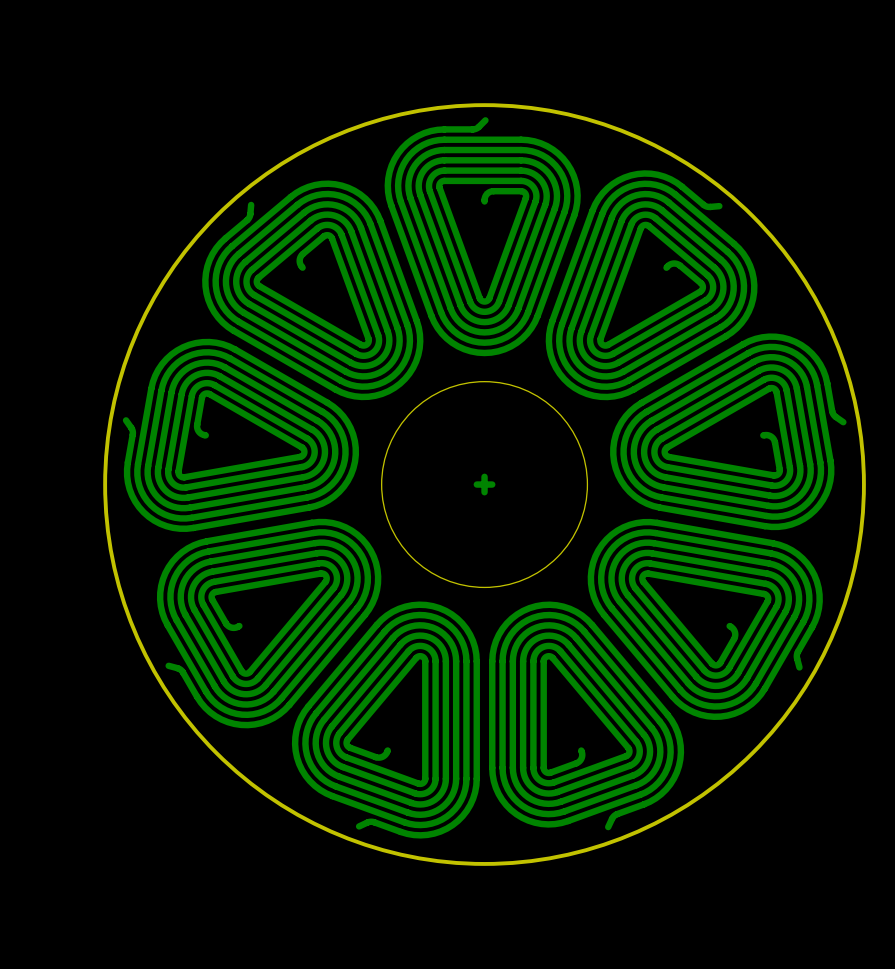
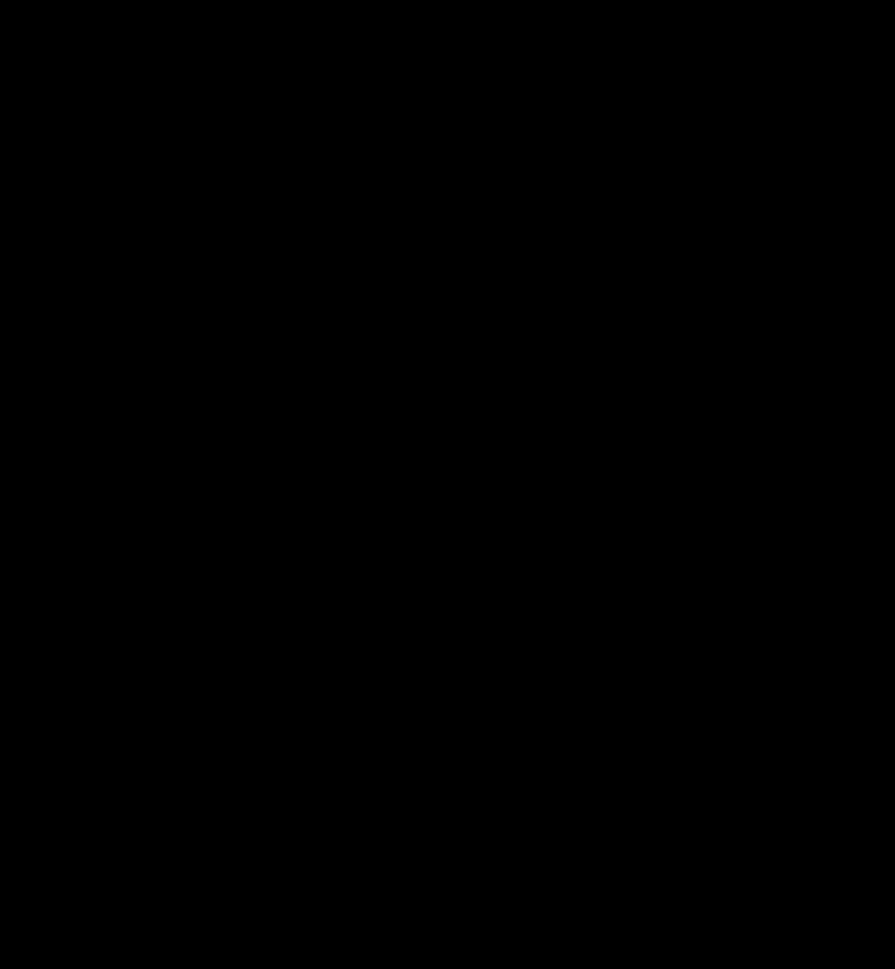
round board edge: [103, 103, 866, 866] -> none
track: (485, 120) (475, 129) (437, 129) (424, 133) (412, 139) (402, 148) (394, 159) (389, 171) (387, 185) (391, 205) (434, 322) (446, 338) (458, 346) (470, 351) (484, 352) (498, 351) (511, 346) (522, 338) (535, 322) (574, 215) (577, 202) (577, 188) (570, 169) (558, 153) (540, 143) (527, 140) (433, 141) (418, 147) (403, 164) (398, 179) (399, 196) (443, 317) (458, 334) (473, 341) (484, 342) (506, 337) (519, 326) (525, 317) (564, 212) (566, 190) (564, 179) (555, 165) (542, 155) (526, 150) (440, 150) (424, 156) (412, 169) (408, 181) (409, 194) (452, 312) (460, 323) (467, 328) (484, 332) (493, 331) (505, 325) (516, 312) (554, 208) (556, 191) (554, 183) (547, 172) (537, 164) (525, 160) (441, 160) (429, 164) (421, 173) (418, 182) (419, 191) (460, 305) (469, 317) (484, 322) (496, 319) (507, 308) (545, 205) (546, 192) (540, 179) (532, 173) (524, 170) (442, 170) (435, 173) (430, 178) (429, 191) (470, 301) (475, 309) (484, 311) (493, 309) (498, 303) (535, 201) (536, 194) (532, 186) (522, 181) (444, 180) (439, 183) (439, 187) (479, 298) (484, 301) (489, 298) (526, 195) (521, 191) (492, 191) (486, 194) (484, 201) -> none
track: (251, 204) (248, 218) (220, 242) (212, 253) (207, 266) (205, 279) (206, 293) (210, 306) (218, 317) (233, 330) (341, 392) (354, 396) (375, 395) (388, 391) (400, 383) (409, 373) (418, 355) (420, 341) (418, 327) (380, 220) (374, 208) (365, 198) (348, 187) (328, 183) (308, 186) (296, 192) (224, 254) (216, 274) (216, 291) (222, 306) (234, 318) (345, 383) (367, 386) (378, 384) (393, 375) (406, 357) (409, 341) (408, 329) (370, 224) (358, 206) (344, 197) (328, 194) (317, 195) (301, 201) (235, 257) (227, 271) (226, 289) (231, 301) (240, 310) (349, 373) (366, 376) (375, 374) (386, 367) (392, 361) (398, 349) (398, 332) (361, 227) (351, 213) (340, 206) (327, 204) (319, 205) (307, 210) (243, 264) (237, 274) (236, 286) (240, 295) (246, 302) (350, 362) (365, 366) (380, 360) (387, 350) (388, 334) (351, 231) (344, 221) (330, 214) (321, 215) (313, 218) (250, 271) (247, 277) (246, 284) (254, 295) (355, 353) (364, 355) (373, 352) (378, 344) (378, 336) (341, 235) (337, 228) (327, 224) (318, 227) (258, 277) (256, 282) (259, 286) (361, 344) (366, 344) (368, 338) (330, 236) (324, 236) (302, 254) (299, 261) (302, 267) -> none
track: (719, 206) (705, 206) (676, 182) (664, 176) (651, 173) (637, 174) (624, 177) (612, 184) (602, 193) (592, 210) (550, 327) (549, 348) (553, 361) (559, 373) (569, 383) (580, 391) (600, 396) (614, 396) (627, 392) (726, 336) (736, 328) (745, 317) (753, 298) (754, 285) (750, 265) (739, 248) (666, 188) (644, 183) (628, 187) (614, 195) (604, 209) (560, 330) (559, 341) (562, 357) (575, 375) (595, 385) (612, 386) (623, 383) (720, 327) (736, 312) (741, 302) (744, 285) (740, 269) (731, 255) (665, 199) (649, 194) (632, 196) (621, 203) (613, 213) (570, 332) (570, 349) (576, 361) (582, 368) (593, 374) (602, 376) (619, 373) (715, 318) (728, 306) (732, 294) (733, 286) (730, 273) (724, 262) (659, 208) (648, 204) (636, 206) (628, 211) (622, 218) (581, 331) (580, 347) (588, 360) (603, 366) (615, 364) (710, 309) (719, 301) (722, 292) (723, 283) (716, 269) (654, 217) (647, 214) (639, 215) (631, 224) (590, 335) (590, 344) (595, 352) (602, 355) (611, 354) (705, 300) (710, 295) (713, 286) (708, 276) (648, 226) (643, 225) (640, 228) (600, 338) (602, 344) (608, 344) (702, 289) (701, 283) (679, 265) (672, 263) (666, 267) -> none
round board edge: [381, 381, 589, 589] -> none
track: (126, 420) (132, 431) (127, 469) (127, 482) (132, 495) (139, 507) (148, 516) (160, 523) (173, 527) (193, 527) (315, 505) (334, 496) (343, 486) (350, 474) (354, 461) (355, 447) (353, 434) (347, 421) (333, 406) (235, 349) (222, 344) (209, 342) (189, 344) (171, 354) (158, 369) (152, 382) (137, 475) (141, 491) (155, 508) (169, 516) (186, 518) (312, 496) (327, 488) (335, 480) (344, 459) (345, 448) (341, 432) (327, 414) (230, 358) (209, 352) (192, 354) (178, 362) (167, 374) (162, 385) (147, 470) (150, 487) (161, 500) (172, 506) (185, 508) (309, 486) (324, 477) (332, 466) (334, 458) (335, 449) (331, 436) (320, 423) (225, 367) (208, 362) (200, 363) (188, 367) (178, 376) (172, 388) (157, 470) (160, 482) (167, 492) (175, 496) (185, 497) (303, 477) (317, 470) (324, 456) (323, 443) (314, 431) (219, 376) (208, 372) (193, 376) (186, 382) (182, 391) (168, 471) (169, 478) (174, 484) (186, 487) (301, 467) (310, 462) (314, 454) (313, 445) (308, 439) (214, 385) (207, 383) (198, 385) (192, 394) (178, 471) (180, 476) (184, 477) (300, 456) (304, 452) (301, 447) (207, 393) (202, 397) (197, 425) (199, 432) (205, 435) -> none
track: (843, 422) (833, 413) (825, 376) (820, 364) (811, 353) (801, 345) (789, 339) (775, 336) (762, 337) (743, 344) (635, 406) (621, 421) (616, 434) (613, 447) (614, 461) (618, 474) (625, 486) (640, 500) (653, 506) (764, 526) (778, 526) (791, 524) (804, 518) (819, 505) (828, 487) (831, 467) (813, 374) (804, 360) (785, 349) (769, 346) (753, 350) (641, 414) (627, 432) (624, 443) (624, 459) (627, 470) (637, 484) (656, 496) (766, 515) (788, 514) (798, 509) (811, 498) (818, 484) (820, 467) (805, 382) (797, 368) (782, 358) (769, 357) (757, 360) (648, 423) (639, 432) (635, 440) (634, 458) (641, 474) (651, 482) (659, 486) (768, 505) (785, 504) (796, 498) (803, 492) (809, 481) (810, 468) (796, 385) (789, 375) (779, 368) (770, 367) (761, 369) (656, 429) (646, 441) (644, 456) (649, 467) (662, 476) (770, 495) (782, 494) (794, 486) (799, 478) (800, 468) (786, 388) (782, 382) (776, 378) (763, 379) (662, 438) (655, 445) (654, 454) (658, 462) (665, 466) (772, 485) (779, 485) (787, 478) (790, 469) (776, 392) (773, 388) (768, 388) (667, 447) (664, 452) (668, 456) (776, 475) (779, 470) (774, 441) (770, 436) (763, 435) -> none
track: (484, 476) (484, 492) -> none
track: (492, 484) (476, 484) -> none
track: (239, 626) (232, 627) (226, 624) (211, 599) (213, 592) (320, 573) (326, 575) (325, 581) (250, 671) (246, 673) (241, 671) (202, 603) (202, 592) (207, 584) (214, 581) (320, 563) (329, 565) (334, 570) (336, 579) (333, 588) (257, 678) (246, 683) (239, 682) (233, 677) (193, 607) (191, 592) (194, 583) (201, 576) (212, 571) (320, 552) (332, 555) (343, 565) (347, 580) (341, 595) (263, 687) (255, 692) (246, 694) (234, 691) (225, 683) (183, 611) (180, 598) (181, 590) (186, 578) (194, 568) (210, 561) (319, 542) (328, 543) (340, 548) (352, 560) (356, 568) (357, 581) (351, 598) (270, 694) (259, 701) (247, 704) (230, 701) (217, 690) (174, 615) (170, 599) (172, 582) (180, 568) (188, 560) (208, 551) (319, 532) (341, 536) (350, 542) (361, 555) (367, 576) (365, 593) (360, 603) (277, 702) (263, 711) (247, 714) (231, 712) (212, 700) (164, 619) (160, 599) (162, 579) (168, 567) (182, 552) (193, 545) (206, 541) (318, 522) (339, 524) (351, 530) (362, 539) (370, 550) (377, 569) (377, 583) (375, 596) (369, 609) (289, 704) (273, 717) (261, 723) (247, 725) (234, 723) (221, 719) (210, 712) (200, 702) (181, 670) (168, 665) -> none
track: (729, 626) (734, 631) (734, 637) (720, 663) (713, 664) (643, 581) (642, 576) (648, 573) (764, 593) (767, 596) (767, 601) (728, 669) (720, 674) (709, 674) (704, 670) (634, 587) (632, 579) (634, 570) (640, 564) (650, 563) (765, 583) (776, 590) (778, 597) (777, 605) (736, 675) (724, 684) (715, 685) (706, 683) (696, 676) (625, 592) (621, 580) (625, 565) (636, 555) (651, 553) (770, 574) (778, 578) (784, 585) (788, 597) (786, 609) (744, 681) (735, 690) (723, 695) (710, 695) (702, 693) (688, 683) (617, 598) (611, 581) (612, 568) (616, 560) (628, 548) (640, 543) (649, 542) (773, 564) (785, 570) (793, 580) (799, 596) (796, 613) (752, 688) (740, 699) (725, 705) (714, 706) (698, 702) (680, 689) (608, 603) (602, 588) (601, 577) (607, 555) (614, 546) (627, 536) (649, 532) (776, 554) (791, 562) (802, 574) (808, 590) (807, 611) (761, 694) (746, 707) (734, 713) (714, 716) (694, 712) (682, 705) (672, 696) (599, 609) (593, 597) (591, 583) (593, 563) (598, 550) (611, 534) (623, 527) (636, 523) (650, 522) (772, 543) (791, 550) (802, 558) (811, 569) (816, 581) (819, 594) (818, 608) (815, 621) (797, 653) (799, 667) -> none
track: (387, 750) (383, 756) (376, 757) (349, 747) (346, 741) (416, 658) (421, 656) (425, 661) (425, 778) (423, 782) (418, 783) (344, 756) (338, 750) (336, 739) (339, 732) (409, 650) (416, 646) (425, 646) (432, 652) (435, 661) (435, 778) (430, 790) (423, 793) (416, 793) (340, 765) (329, 755) (326, 746) (326, 737) (331, 726) (402, 642) (413, 636) (428, 637) (441, 646) (445, 661) (445, 781) (442, 790) (437, 797) (426, 803) (414, 803) (335, 775) (328, 770) (320, 760) (316, 747) (316, 735) (324, 719) (395, 634) (410, 626) (419, 625) (432, 627) (446, 637) (453, 648) (455, 656) (455, 783) (452, 795) (444, 805) (429, 813) (411, 813) (330, 784) (317, 774) (308, 760) (305, 743) (306, 732) (316, 713) (388, 627) (408, 616) (424, 615) (435, 617) (454, 630) (461, 639) (466, 655) (466, 784) (461, 800) (451, 813) (436, 821) (415, 824) (326, 793) (314, 785) (302, 770) (295, 750) (296, 730) (300, 717) (308, 706) (381, 619) (398, 608) (412, 605) (426, 605) (439, 608) (451, 614) (466, 628) (472, 641) (476, 654) (476, 778) (473, 798) (466, 810) (457, 820) (446, 828) (434, 833) (420, 835) (407, 833) (371, 821) (359, 826) -> none
track: (581, 750) (581, 757) (577, 762) (550, 772) (544, 770) (543, 661) (547, 656) (552, 658) (628, 748) (629, 752) (626, 756) (552, 782) (541, 781) (535, 774) (533, 767) (533, 659) (537, 651) (543, 646) (552, 646) (560, 651) (636, 741) (639, 753) (636, 760) (631, 765) (554, 792) (545, 793) (536, 790) (526, 779) (523, 767) (523, 658) (529, 644) (540, 637) (555, 636) (568, 644) (645, 737) (649, 745) (649, 754) (645, 766) (635, 774) (557, 802) (548, 803) (535, 801) (524, 794) (516, 784) (512, 767) (513, 656) (517, 644) (522, 637) (536, 627) (545, 625) (558, 626) (573, 635) (654, 731) (659, 743) (659, 756) (653, 772) (640, 783) (559, 812) (548, 814) (532, 810) (517, 802) (507, 789) (502, 767) (502, 655) (507, 639) (514, 630) (533, 617) (549, 615) (560, 616) (580, 627) (663, 726) (669, 741) (670, 757) (664, 773) (650, 789) (561, 822) (548, 824) (528, 820) (511, 809) (498, 793) (493, 781) (492, 767) (492, 654) (496, 641) (502, 628) (517, 614) (529, 608) (542, 605) (563, 606) (576, 611) (587, 619) (667, 714) (677, 732) (680, 745) (680, 759) (676, 772) (670, 784) (661, 794) (649, 801) (615, 815) (608, 827) -> none

